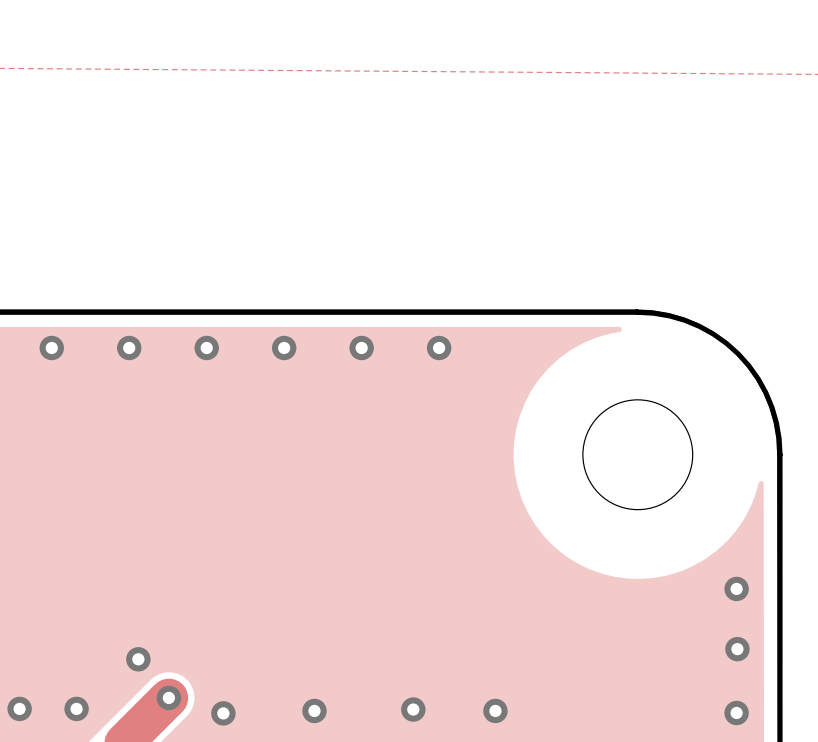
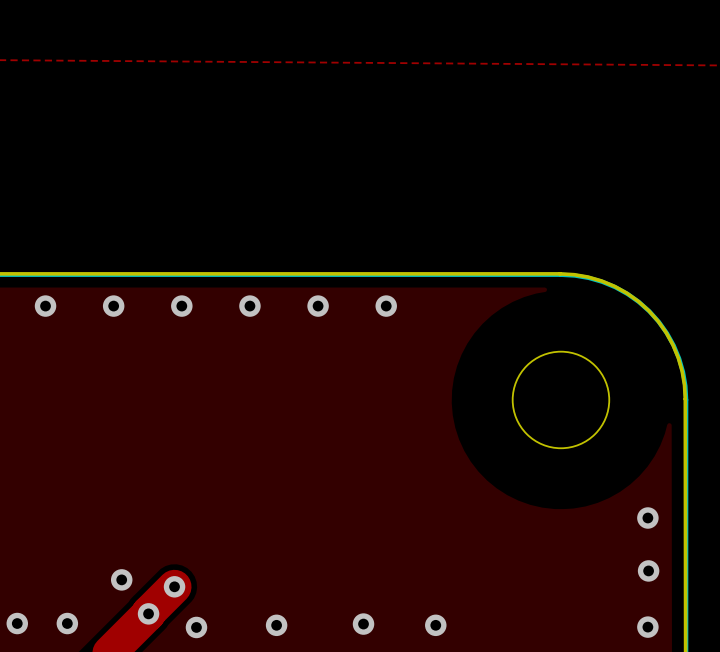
track: none -> (174, 586) (148, 613)
via: none -> (174, 586)

